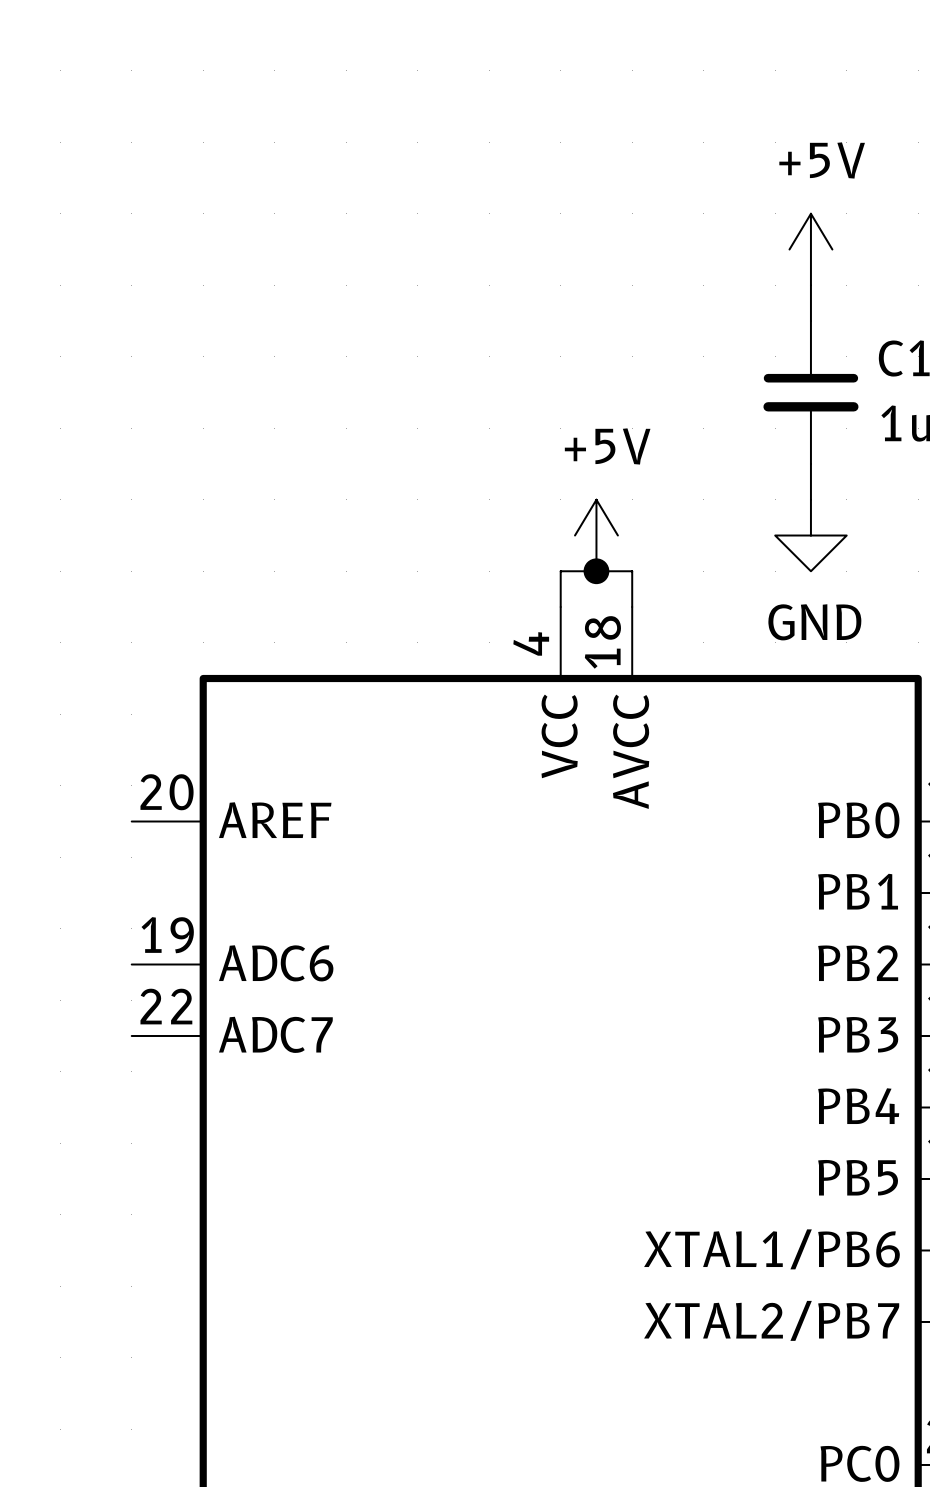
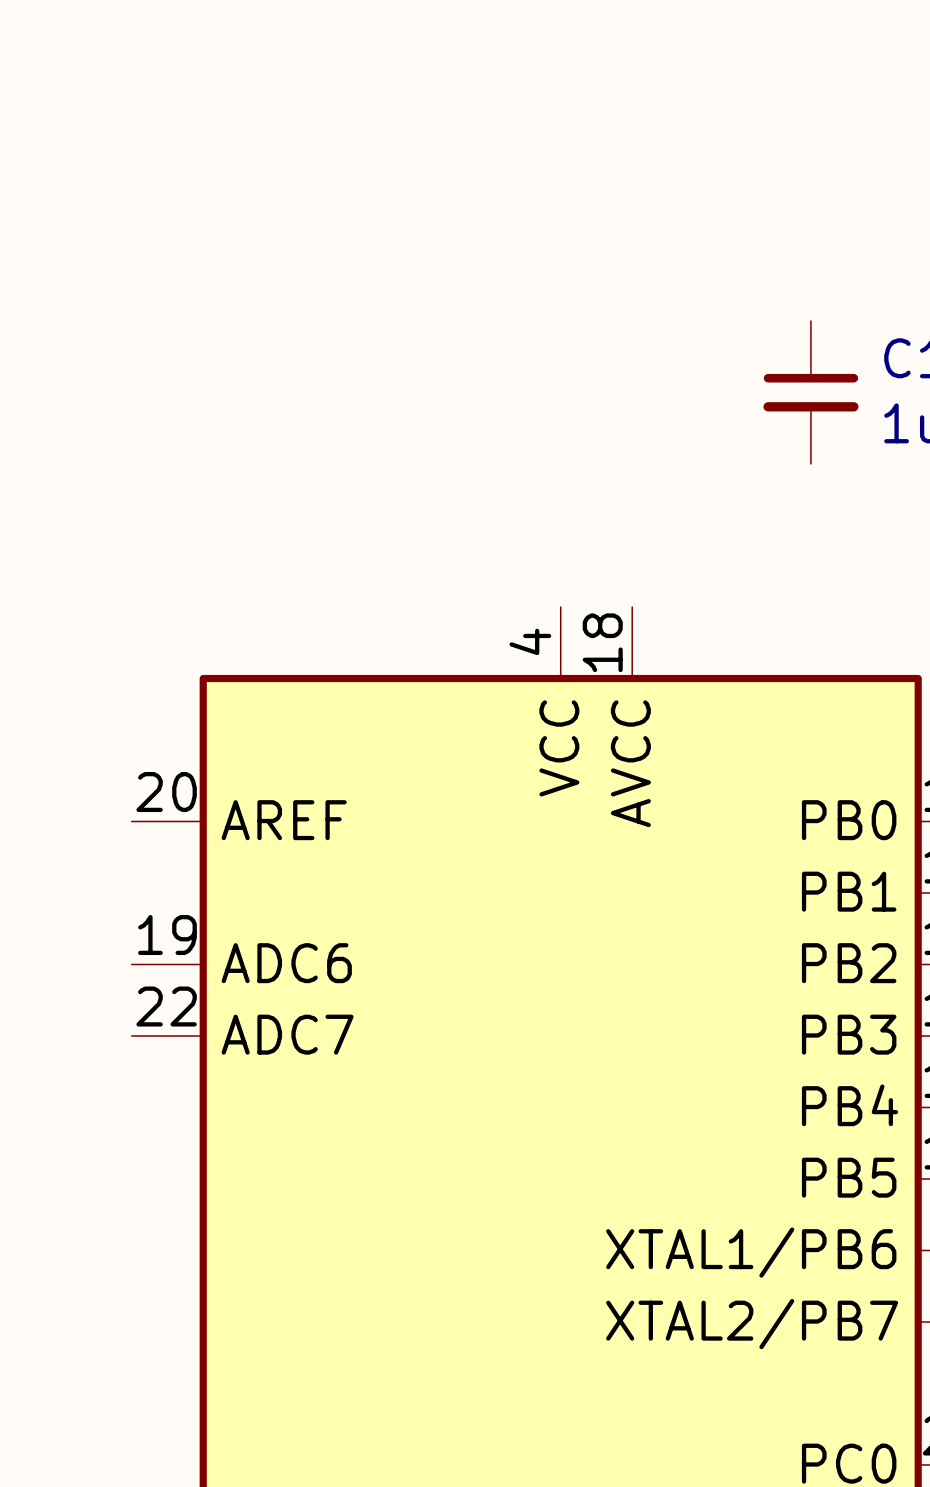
power symbol: +5V (810, 249) -> none
wire: (810, 285) (810, 321) -> none
wire: (810, 464) (810, 499) -> none
power symbol: +5V (596, 535) -> none
power symbol: GND (810, 535) -> none
junction: (596, 571) -> none
wire: (560, 607) (560, 571) (632, 571) (632, 607) -> none

